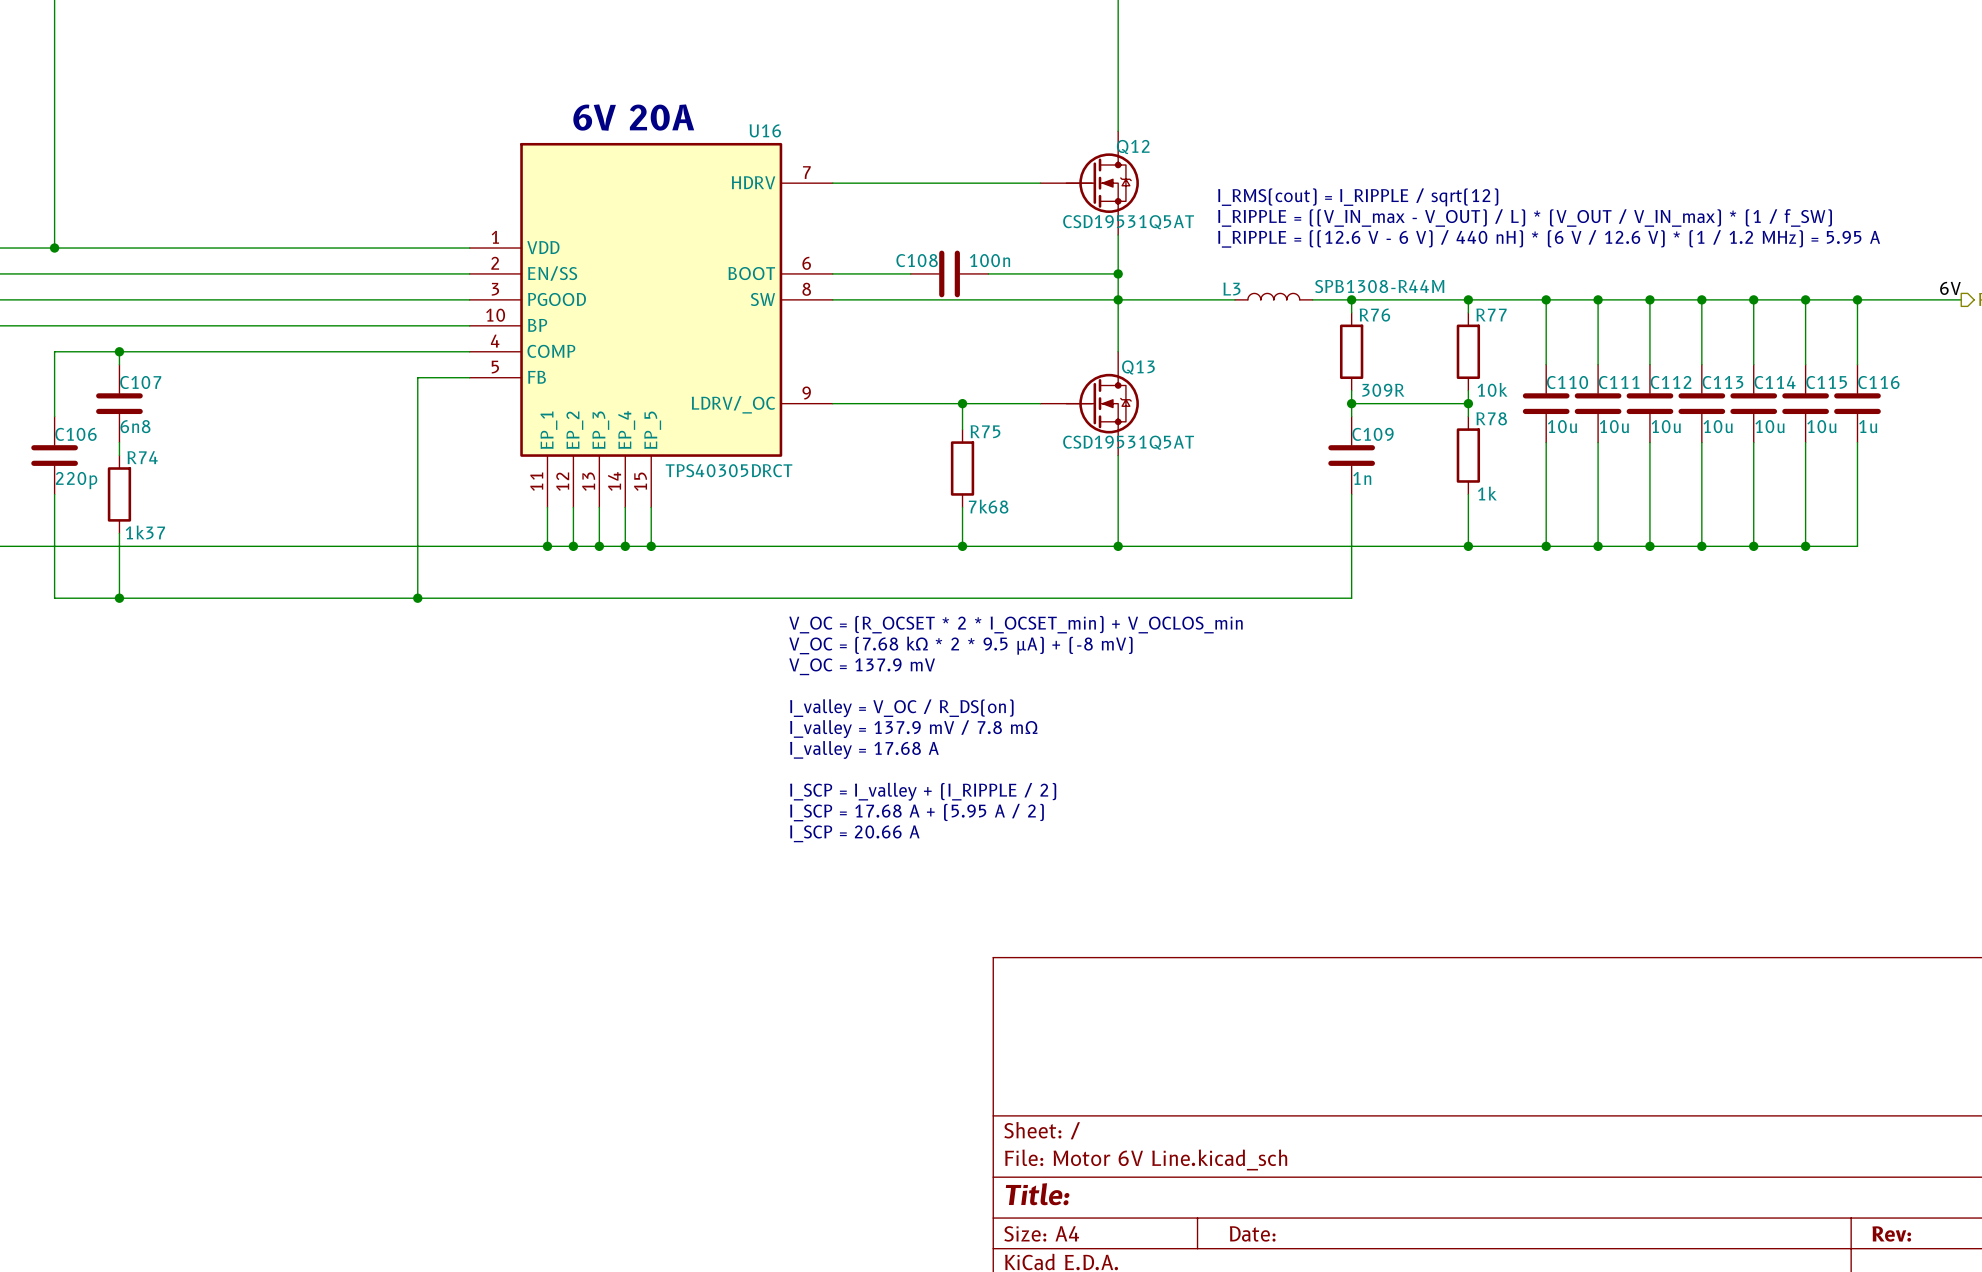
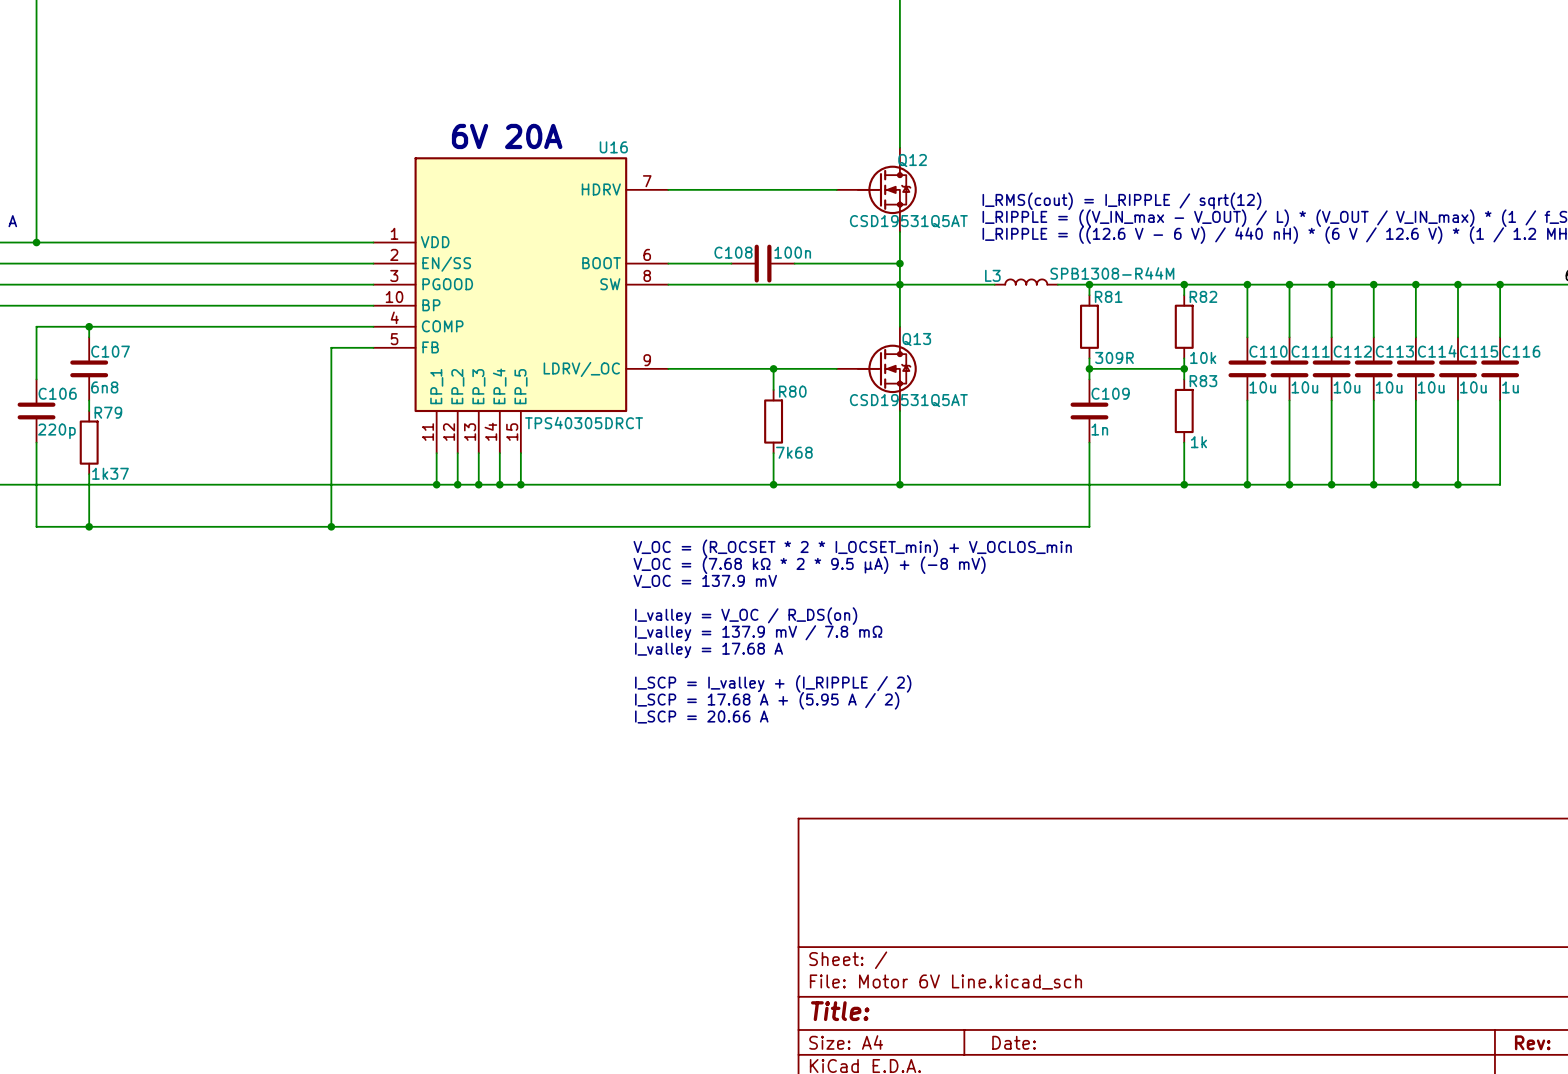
R76 name: R76 (1374, 315) -> R81 (1108, 296)
R77 name: R77 (1491, 315) -> R82 (1203, 296)
R78 name: R78 (1491, 418) -> R83 (1203, 381)
R75 name: R75 (985, 431) -> R80 (792, 391)
R74 name: R74 (142, 457) -> R79 (108, 412)

